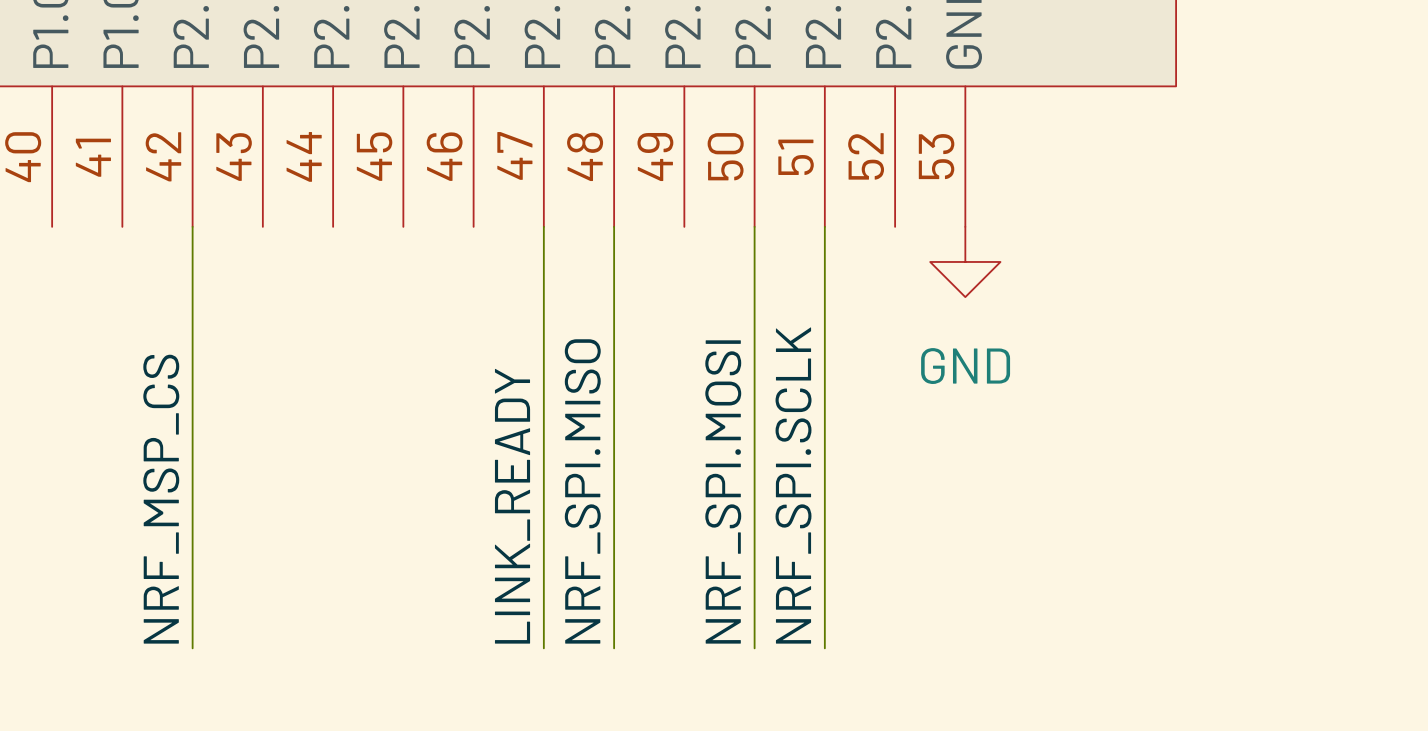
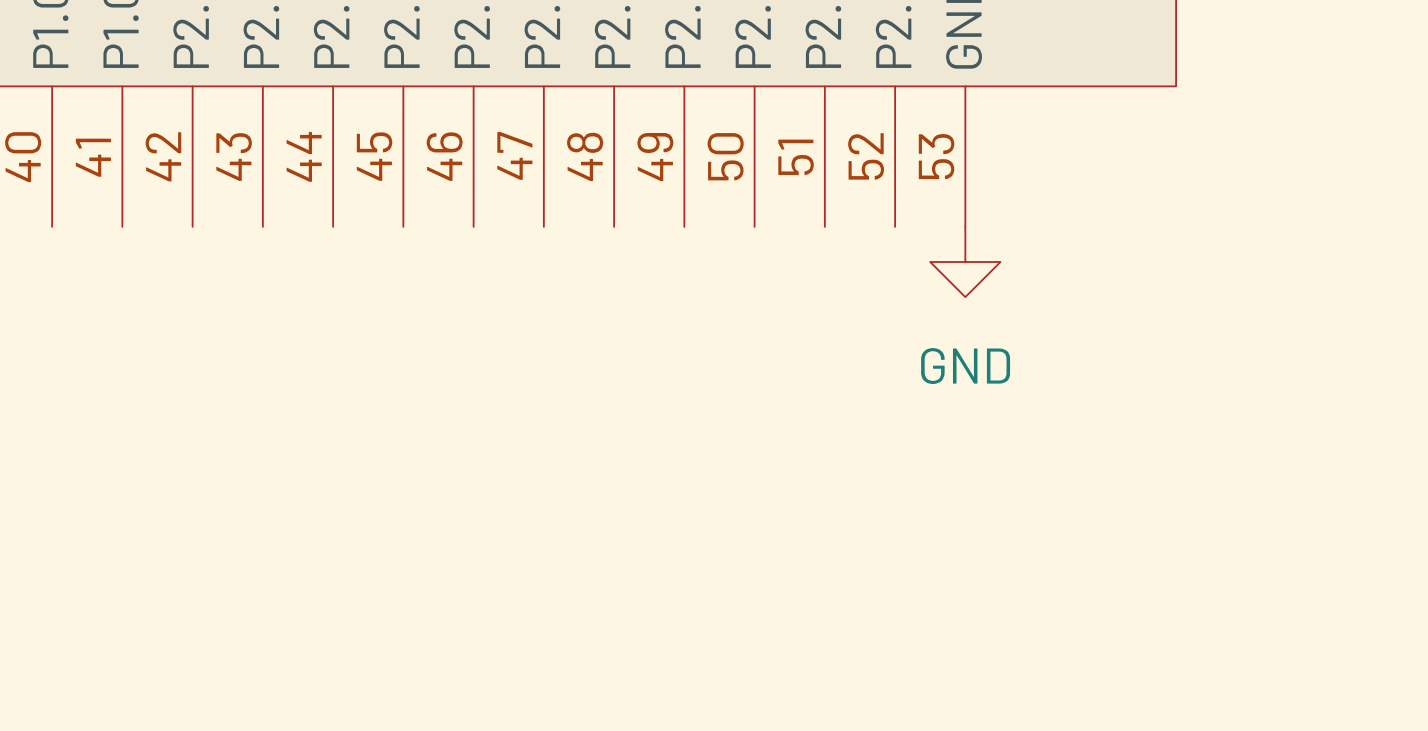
wire: (192, 226) (192, 648) -> none
wire: (543, 226) (543, 648) -> none
wire: (614, 226) (614, 648) -> none
wire: (754, 226) (754, 648) -> none
wire: (824, 226) (824, 648) -> none
label: NRF_SPI.SCLK (793, 485) -> none
label: NRF_SPI.MISO (582, 491) -> none
label: NRF_SPI.MOSI (723, 491) -> none
label: NRF_MSP_CS (161, 499) -> none
label: LINK_READY (512, 506) -> none

